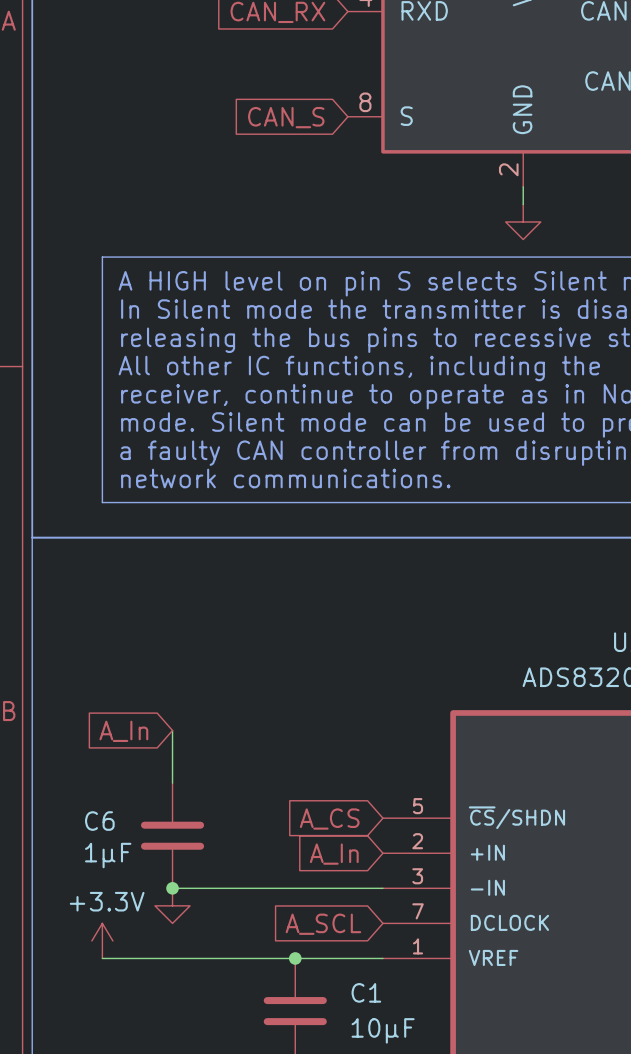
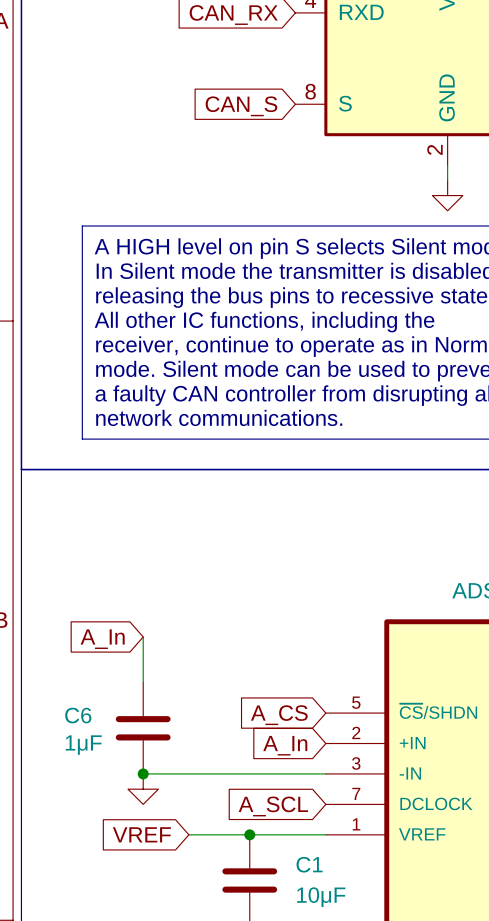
power symbol: +3.3V (102, 940) -> none
wire: (102, 958) (225, 958) -> none
global label: none -> VREF (141, 834)

